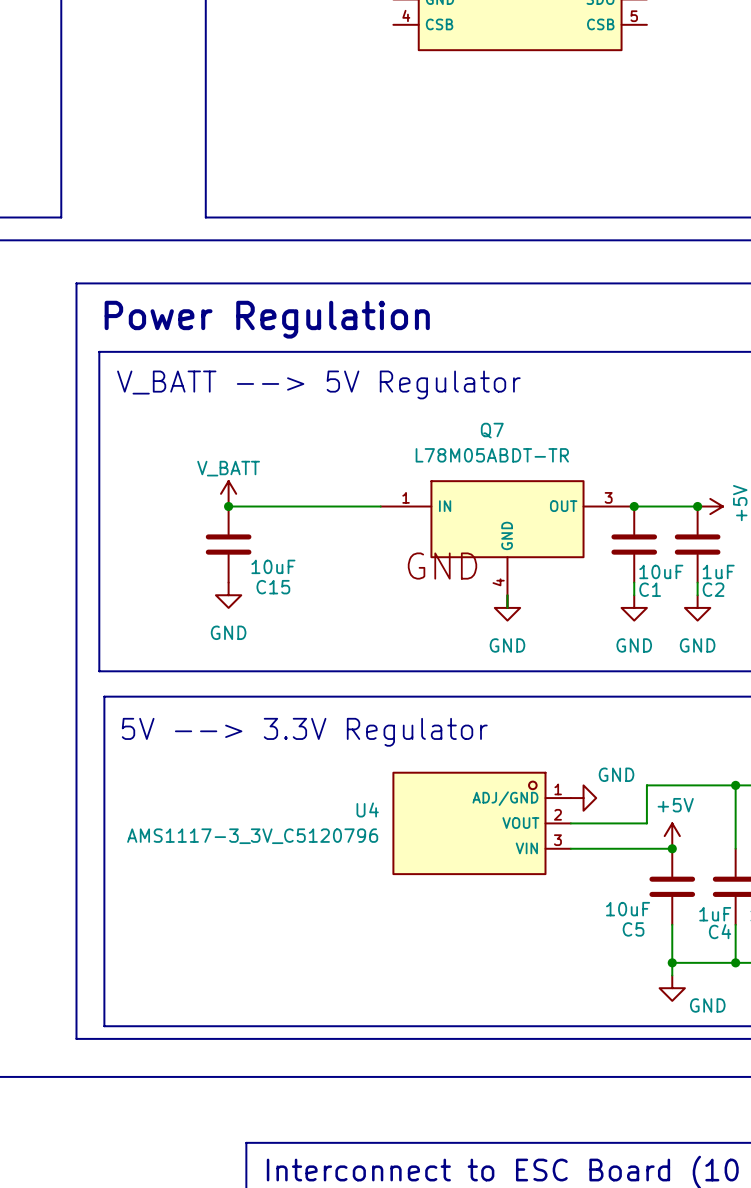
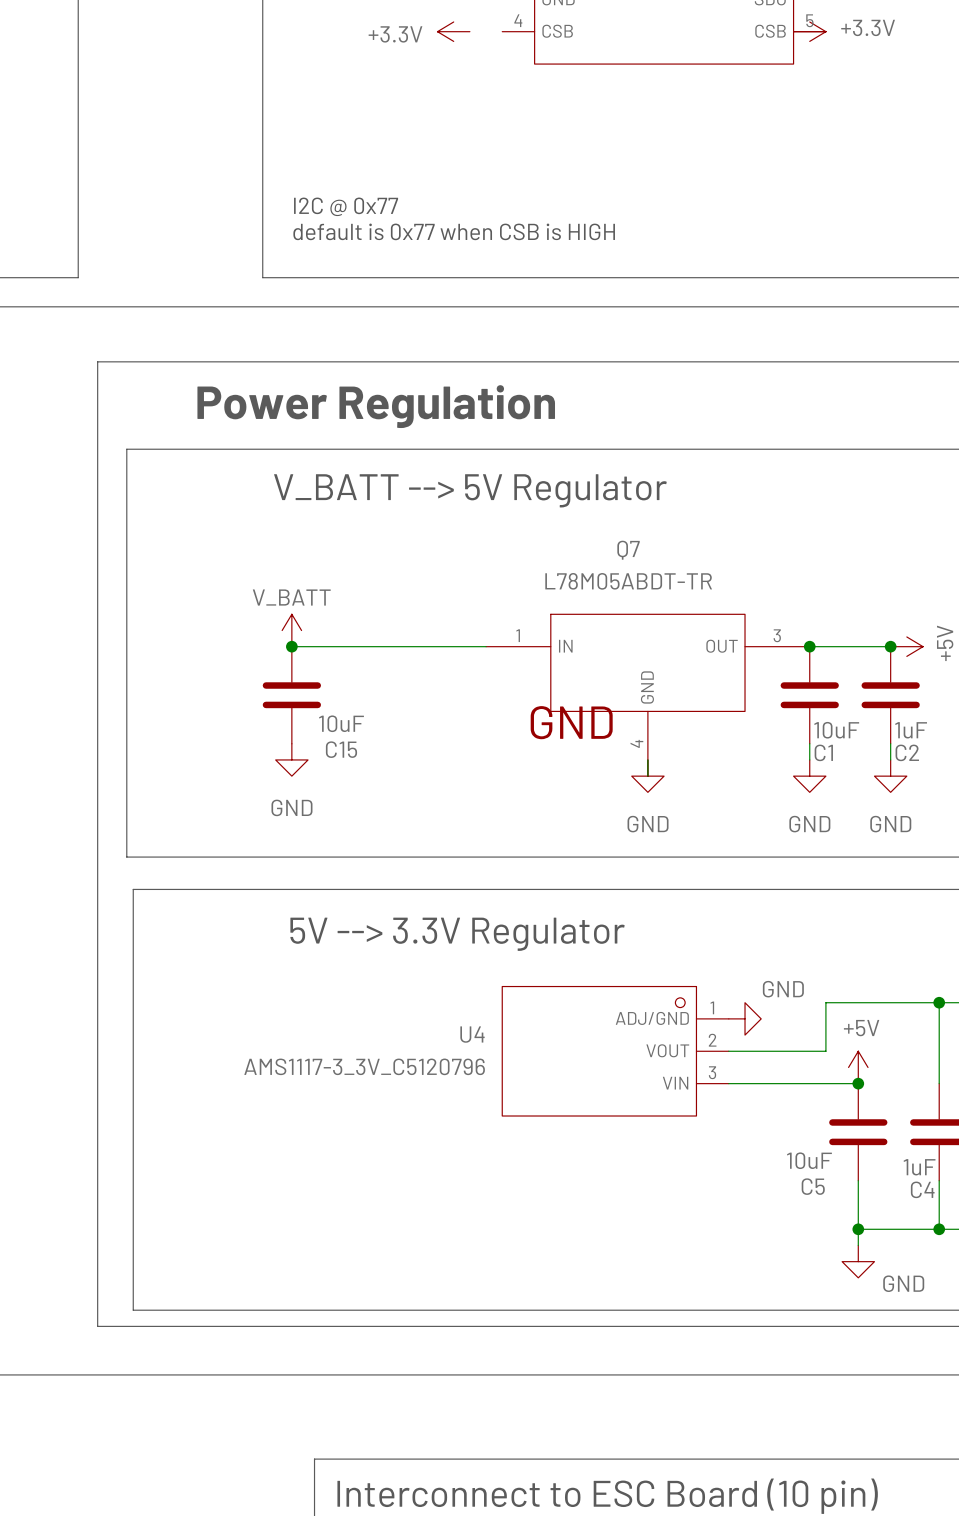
power symbol: none -> +3.3V (453, 31)
power symbol: none -> +3.3V (809, 31)
text: none -> I2C @ 0x77 (346, 206)
text: none -> default is 0x77 when CSB is HIGH (454, 231)

